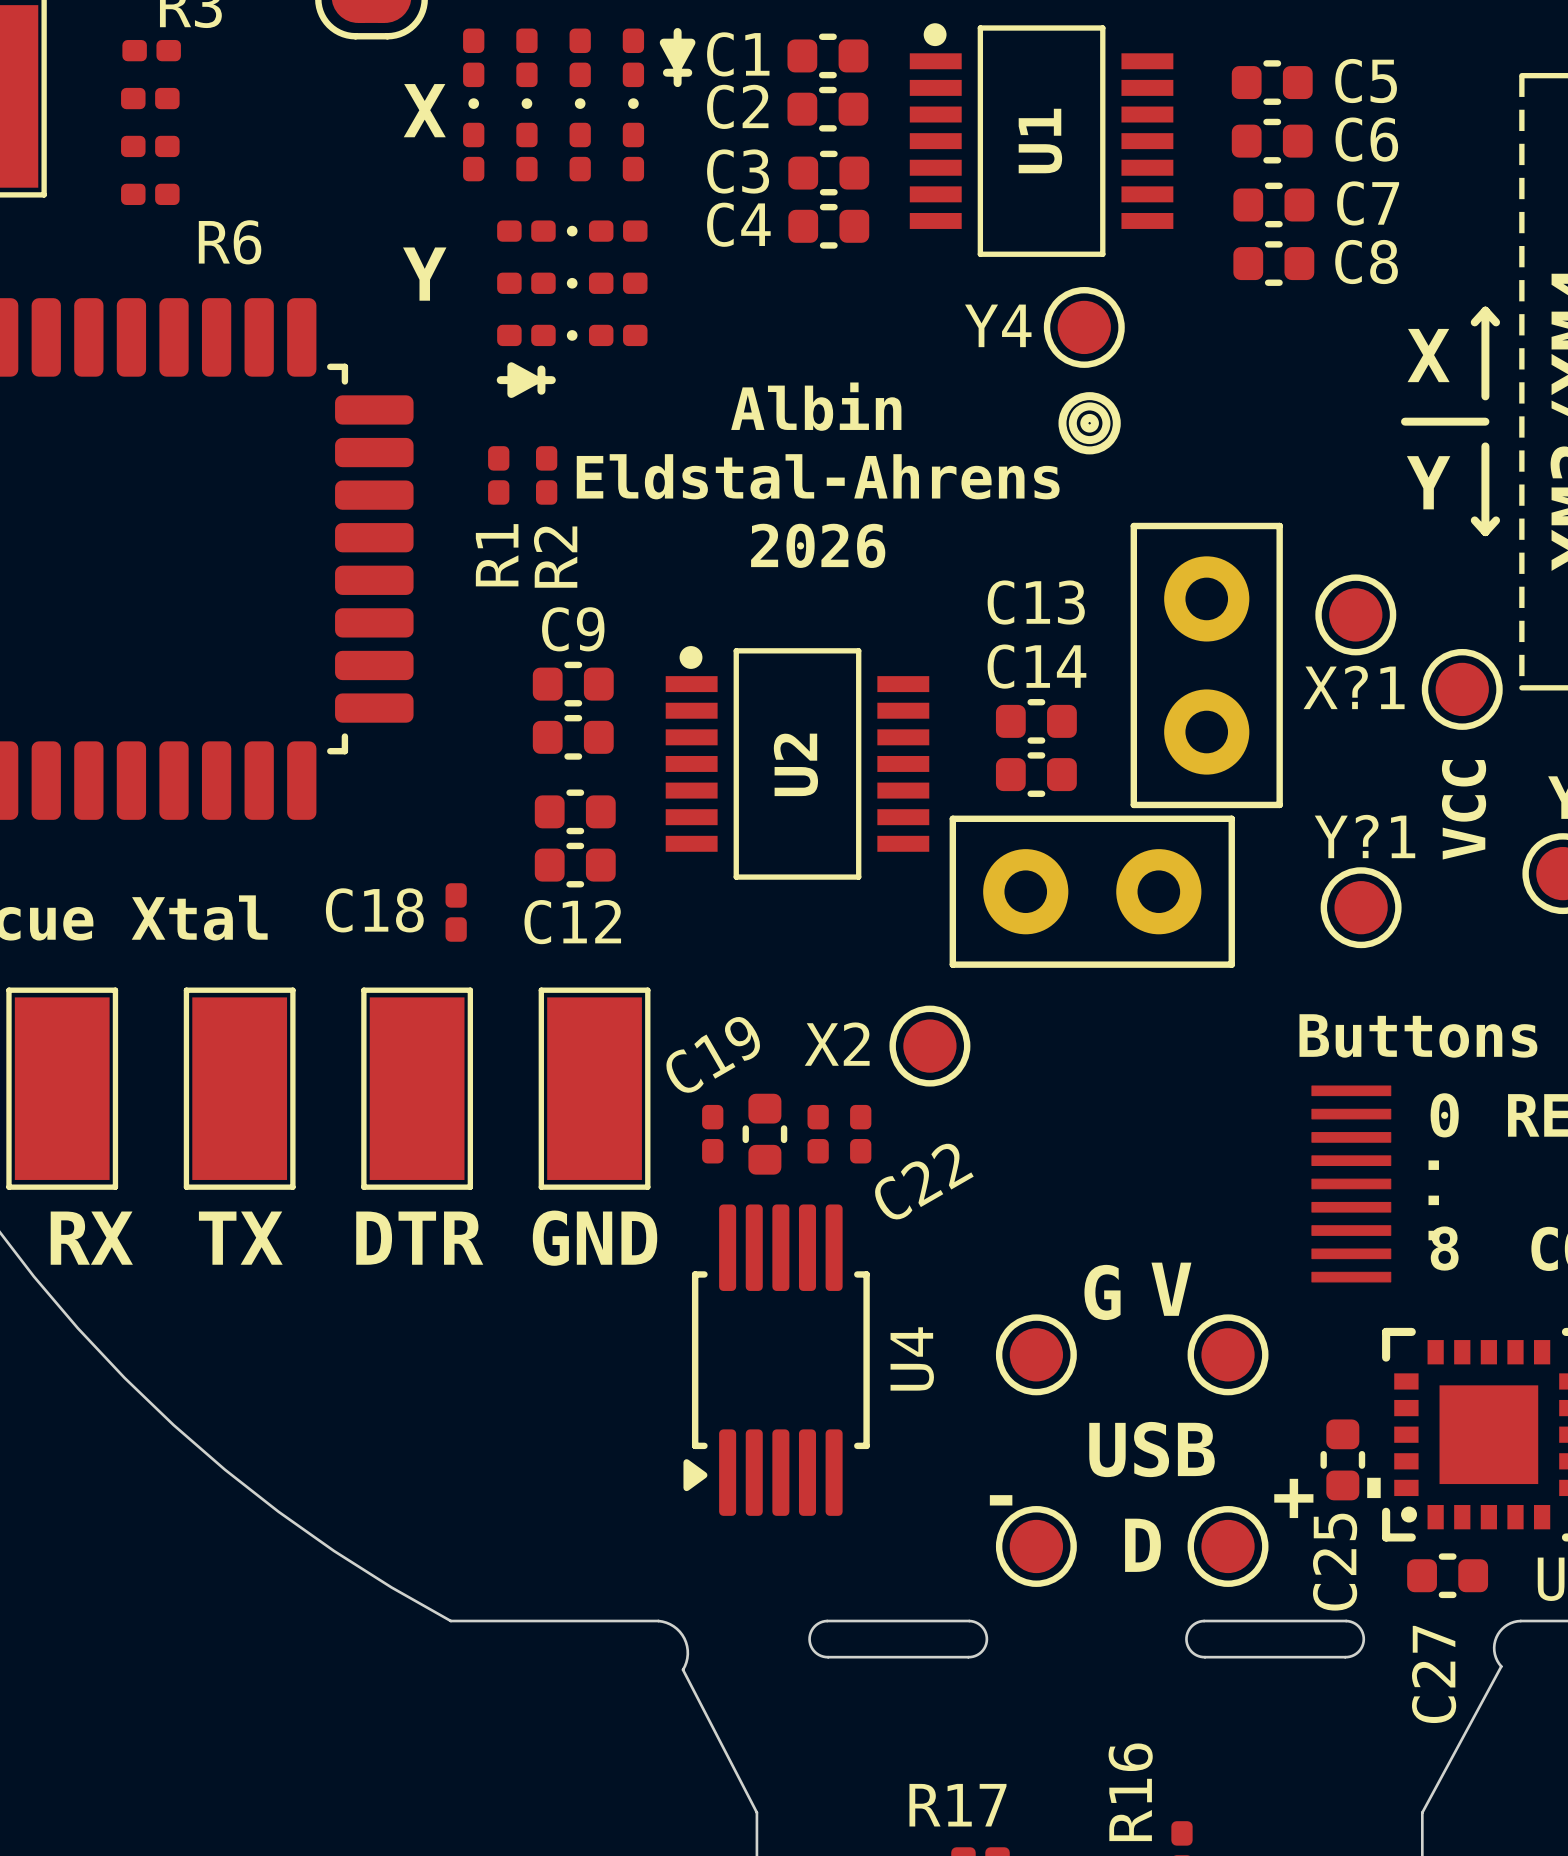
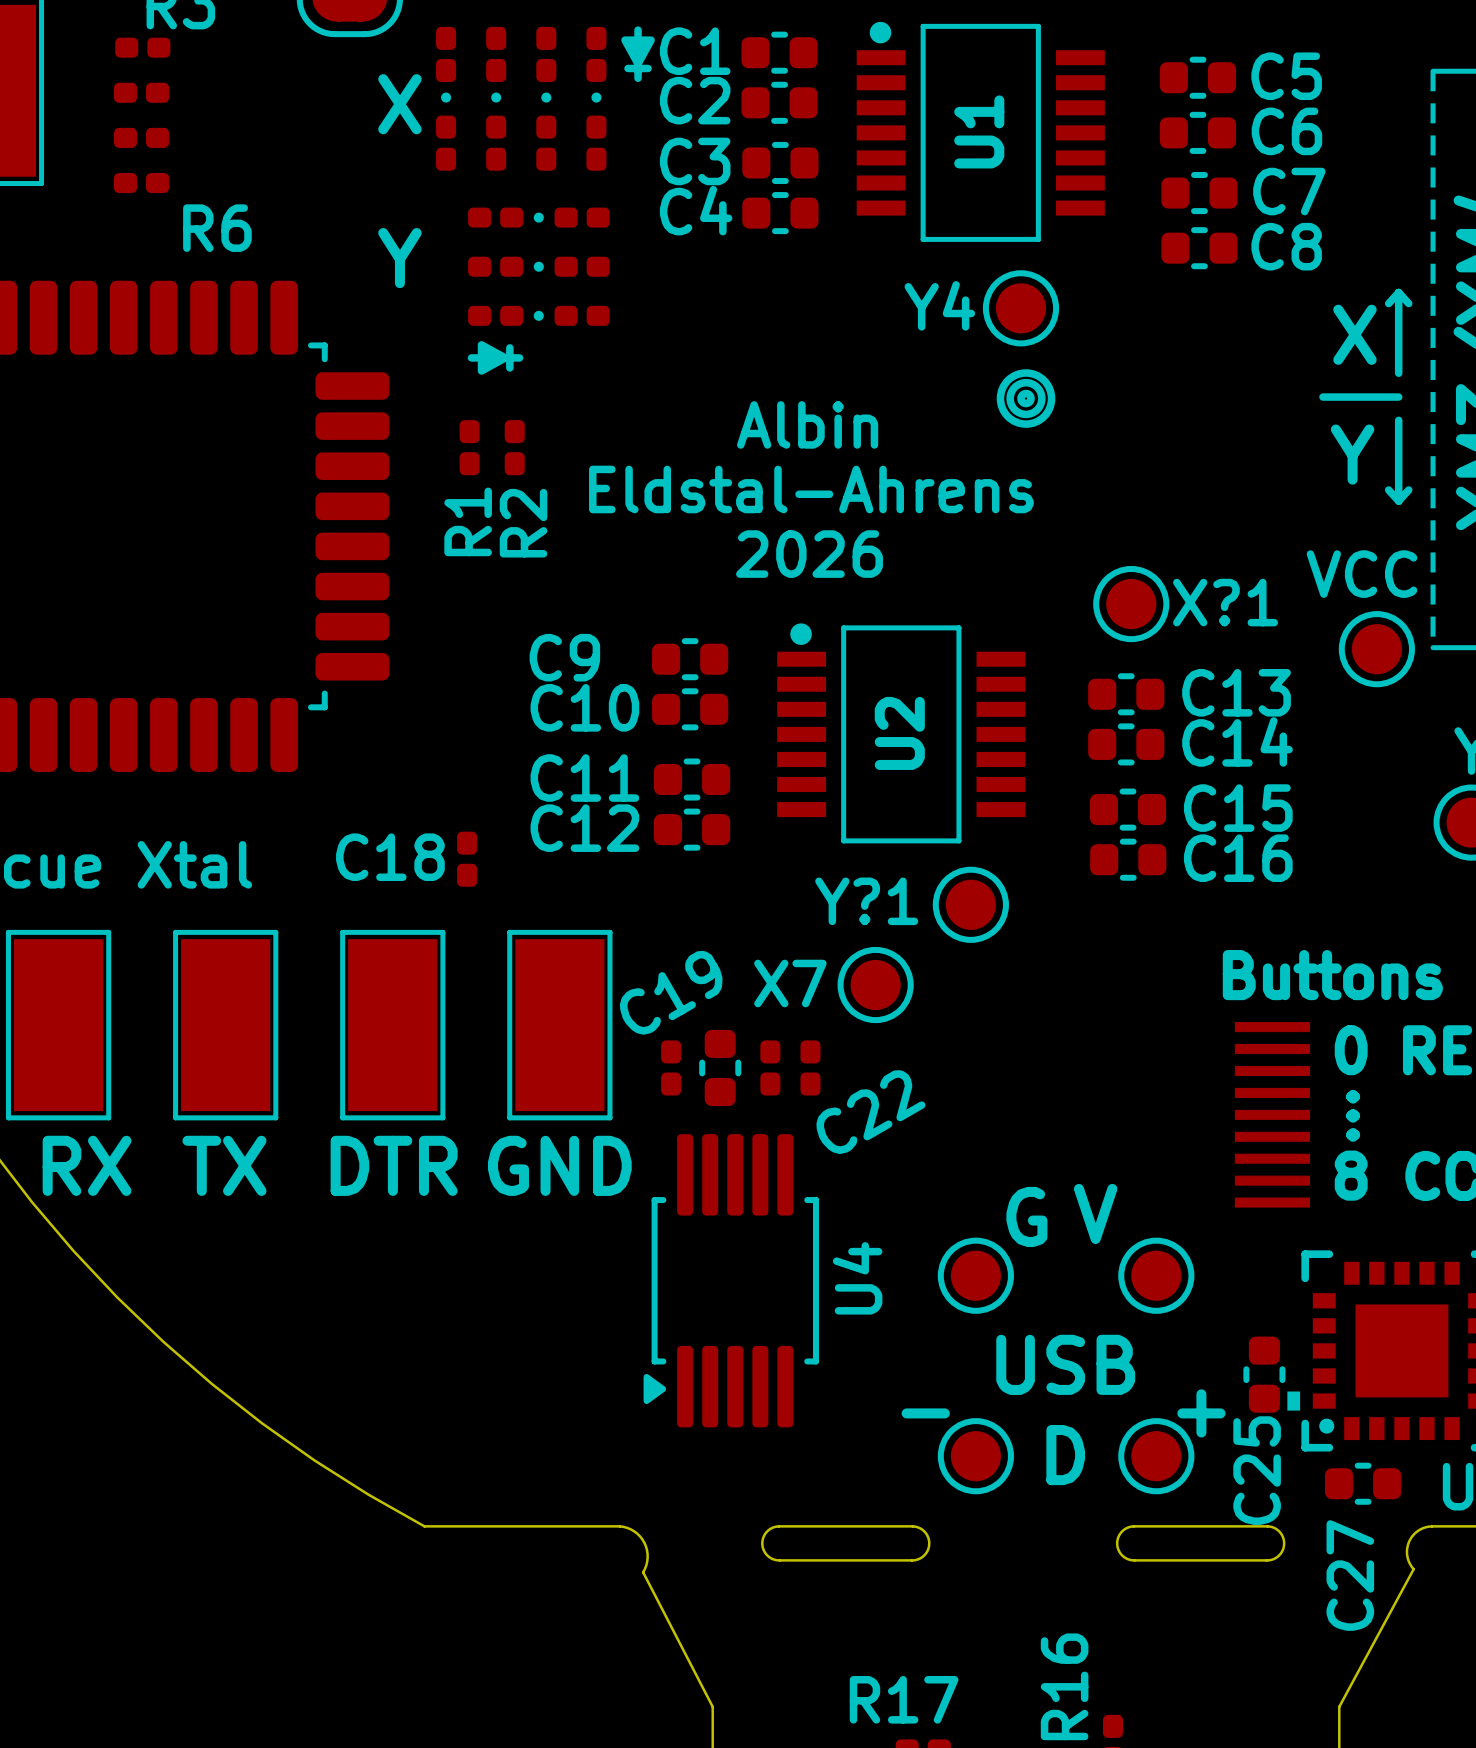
text position: Albin (816, 406) -> Albin (807, 424)
text position: Eldstal-Ahrens (818, 476) -> Eldstal-Ahrens (811, 489)
text position: 2026 (818, 545) -> 2026 (809, 554)
C13 name position: C13 (1036, 602) -> C13 (1236, 692)
X?1 position: (1355, 614) -> (1131, 604)
C9 name position: C9 (573, 629) -> C9 (564, 657)
part: (1206, 665) -> none
C14 name position: C14 (1036, 666) -> C14 (1237, 741)
C9 position: (573, 684) -> (690, 659)
X?1 name position: X?1 (1354, 687) -> X?1 (1225, 602)
C13 position: (1036, 721) -> (1126, 694)
part: (573, 737) -> none
C10: none -> (690, 709)
U2 position: (797, 762) -> (901, 733)
C14 position: (1036, 774) -> (1126, 744)
text rotation: 0° (1464, 809) -> 90° clockwise (1362, 574)
text position: VCC (1464, 809) -> VCC (1362, 574)
part: (575, 811) -> none
C11: none -> (692, 779)
Y?1 name position: Y?1 (1364, 836) -> Y?1 (866, 901)
C15: none -> (1128, 809)
C12 position: (575, 865) -> (692, 829)
part: (1092, 891) -> none
Y?1 position: (1361, 907) -> (970, 904)
C18 position: (456, 912) -> (467, 859)
C16: none -> (1128, 859)
C12 name position: C12 (572, 922) -> C12 (584, 828)
X2 name: X2 (837, 1044) -> X7 (790, 983)

